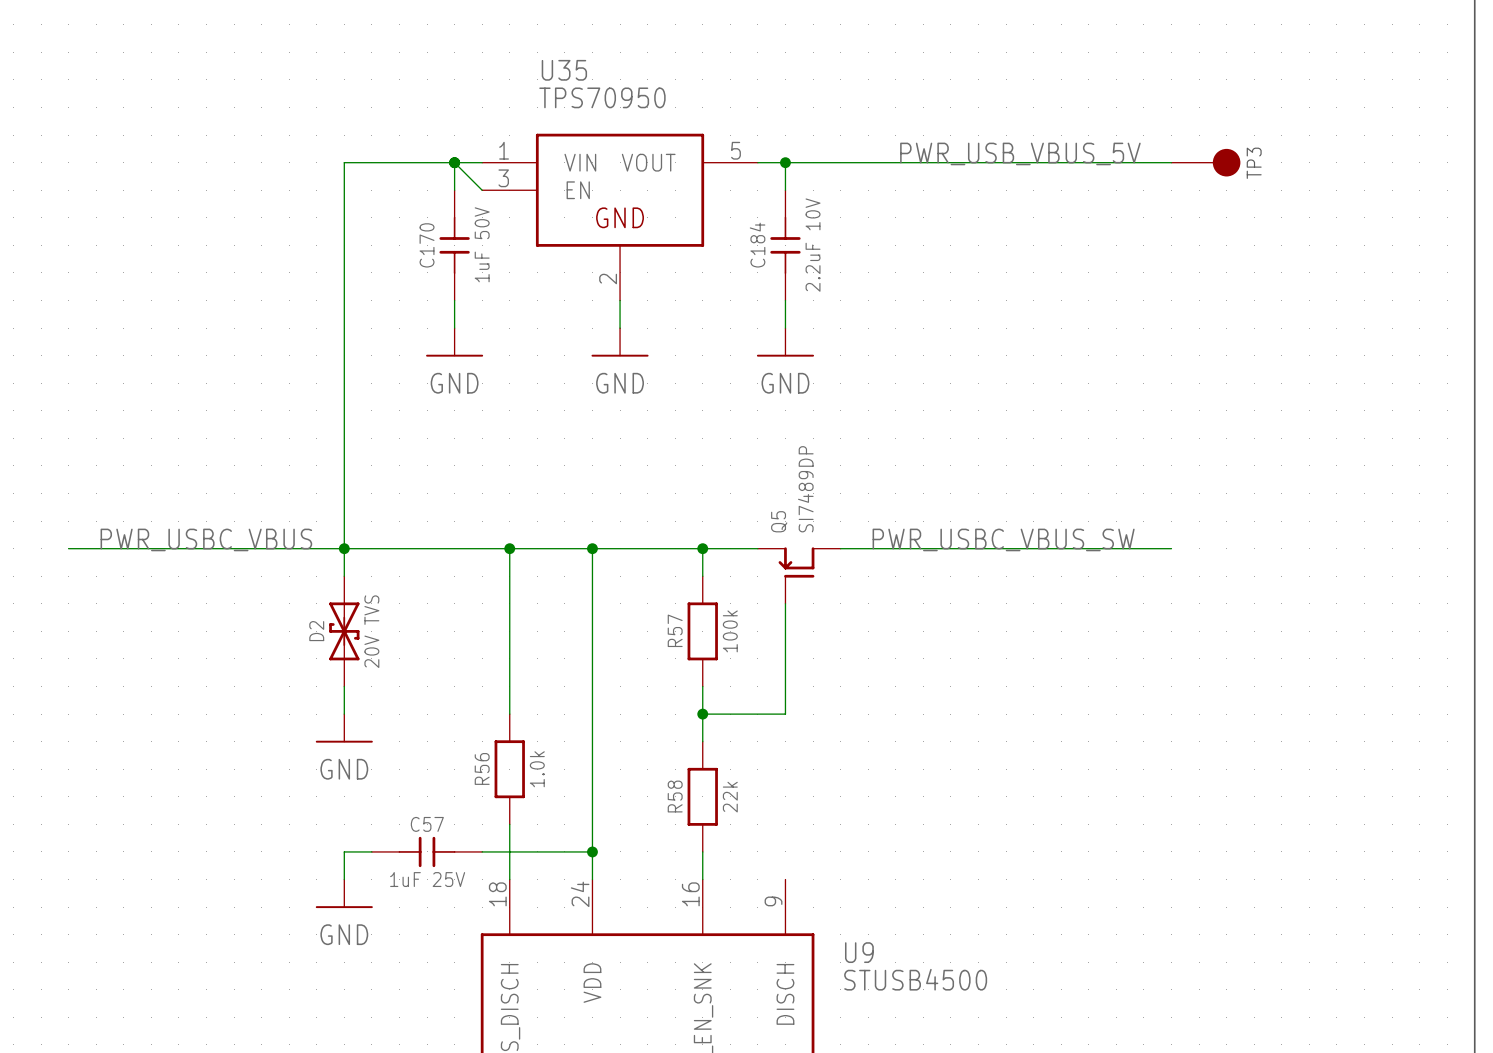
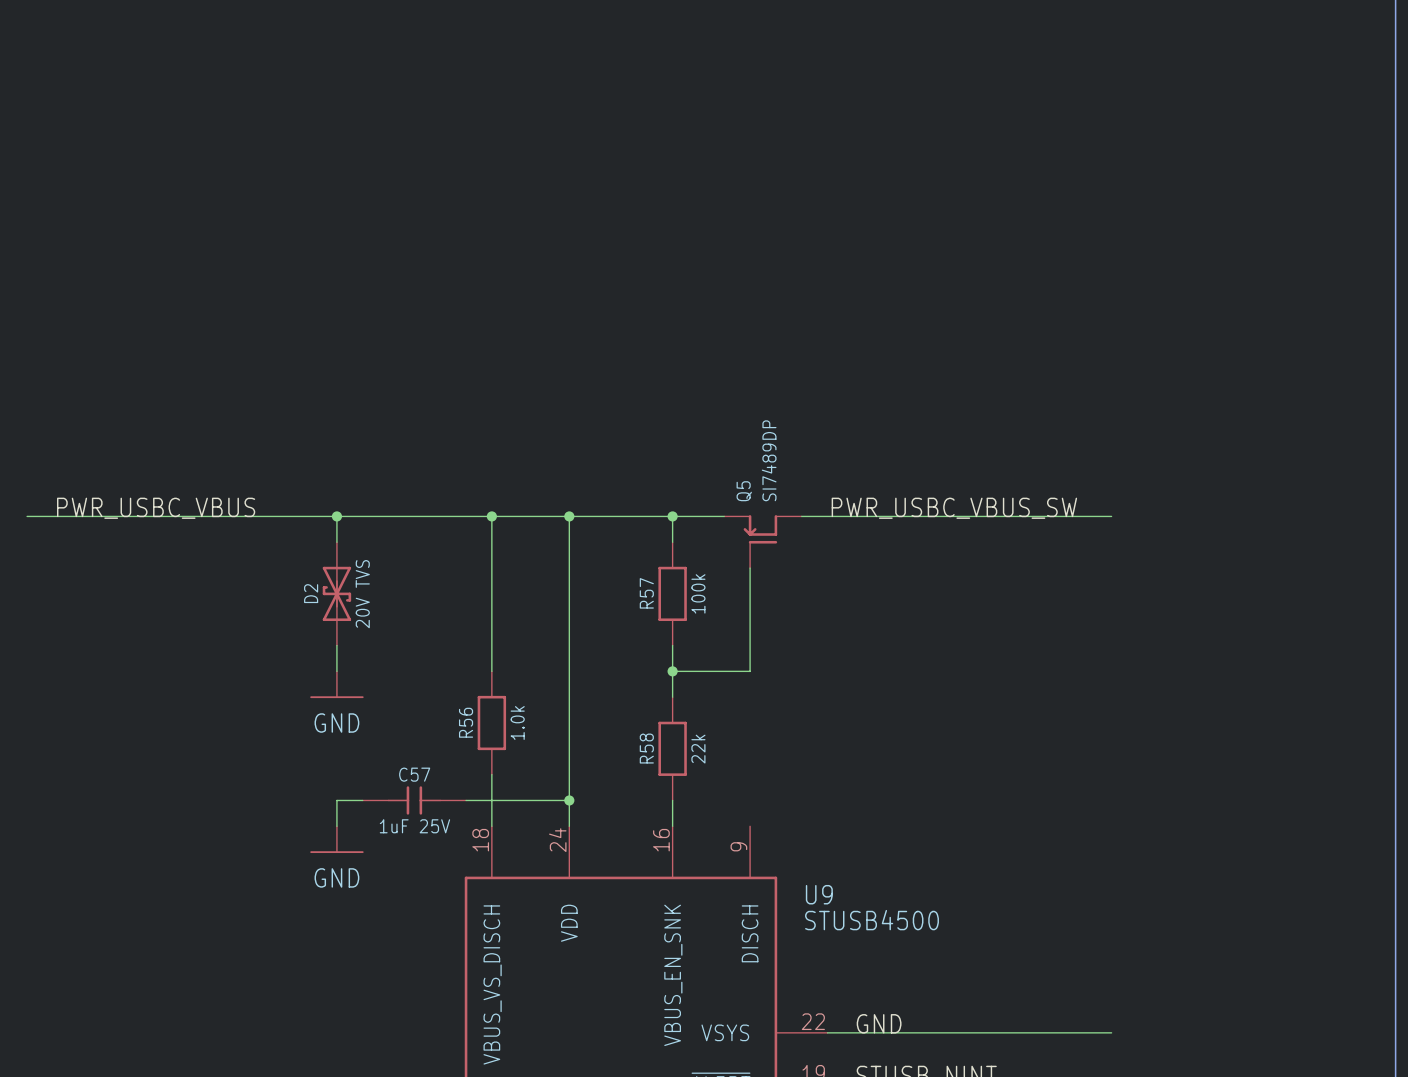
label: PWR_USB_VBUS_5V (1020, 153) -> none
junction: (454, 162) -> none
wire: (482, 162) (344, 162) (344, 548) -> none
wire: (757, 162) (1171, 162) -> none
wire: (785, 162) (785, 190) -> none
junction: (785, 162) -> none
TP3: (1205, 162) -> none
wire: (454, 190) (454, 162) (482, 190) -> none
U35: TPS70950 (620, 217) -> none
C170: 1uF 50V (454, 245) -> none
C184: 2.2uF 10V (785, 245) -> none
wire: (454, 300) (454, 328) -> none
wire: (620, 300) (620, 328) -> none
wire: (785, 300) (785, 328) -> none
power symbol: GND (454, 342) -> none
power symbol: GND (620, 342) -> none
power symbol: GND (785, 342) -> none
label position: PWR_USBC_VBUS (206, 539) -> PWR_USBC_VBUS (156, 508)
wire: none -> (27, 516) (78, 516)

